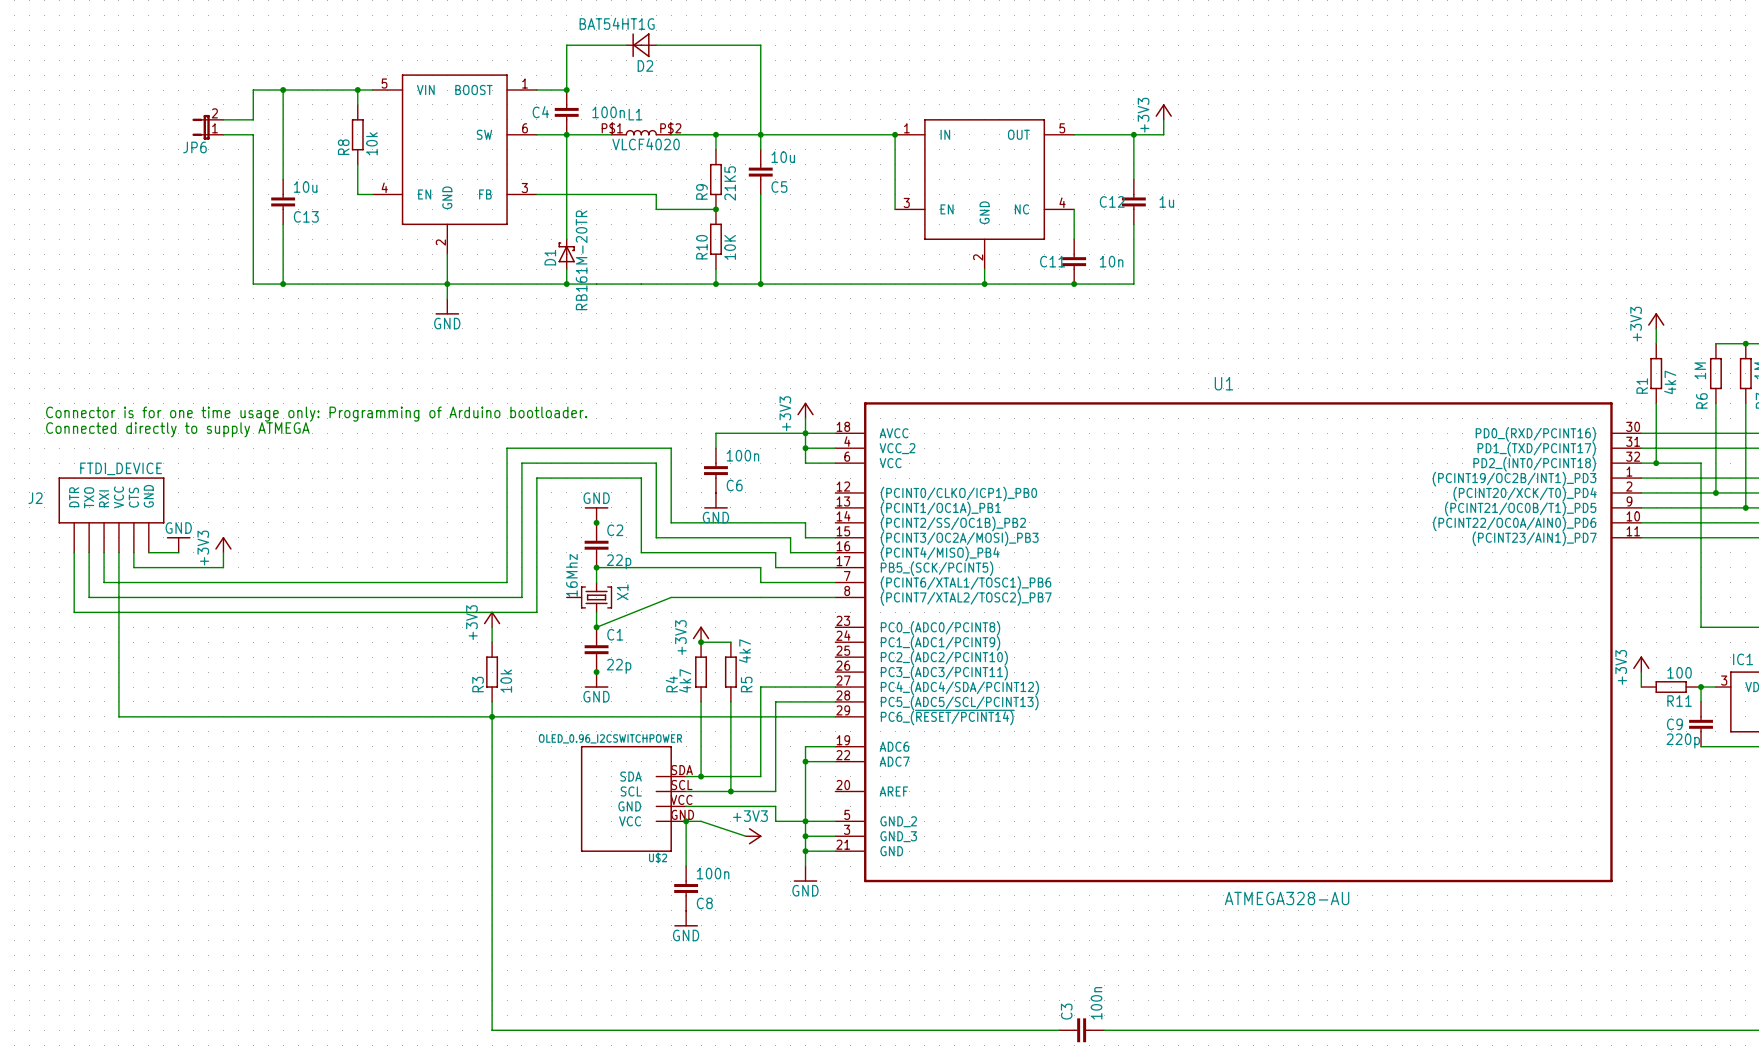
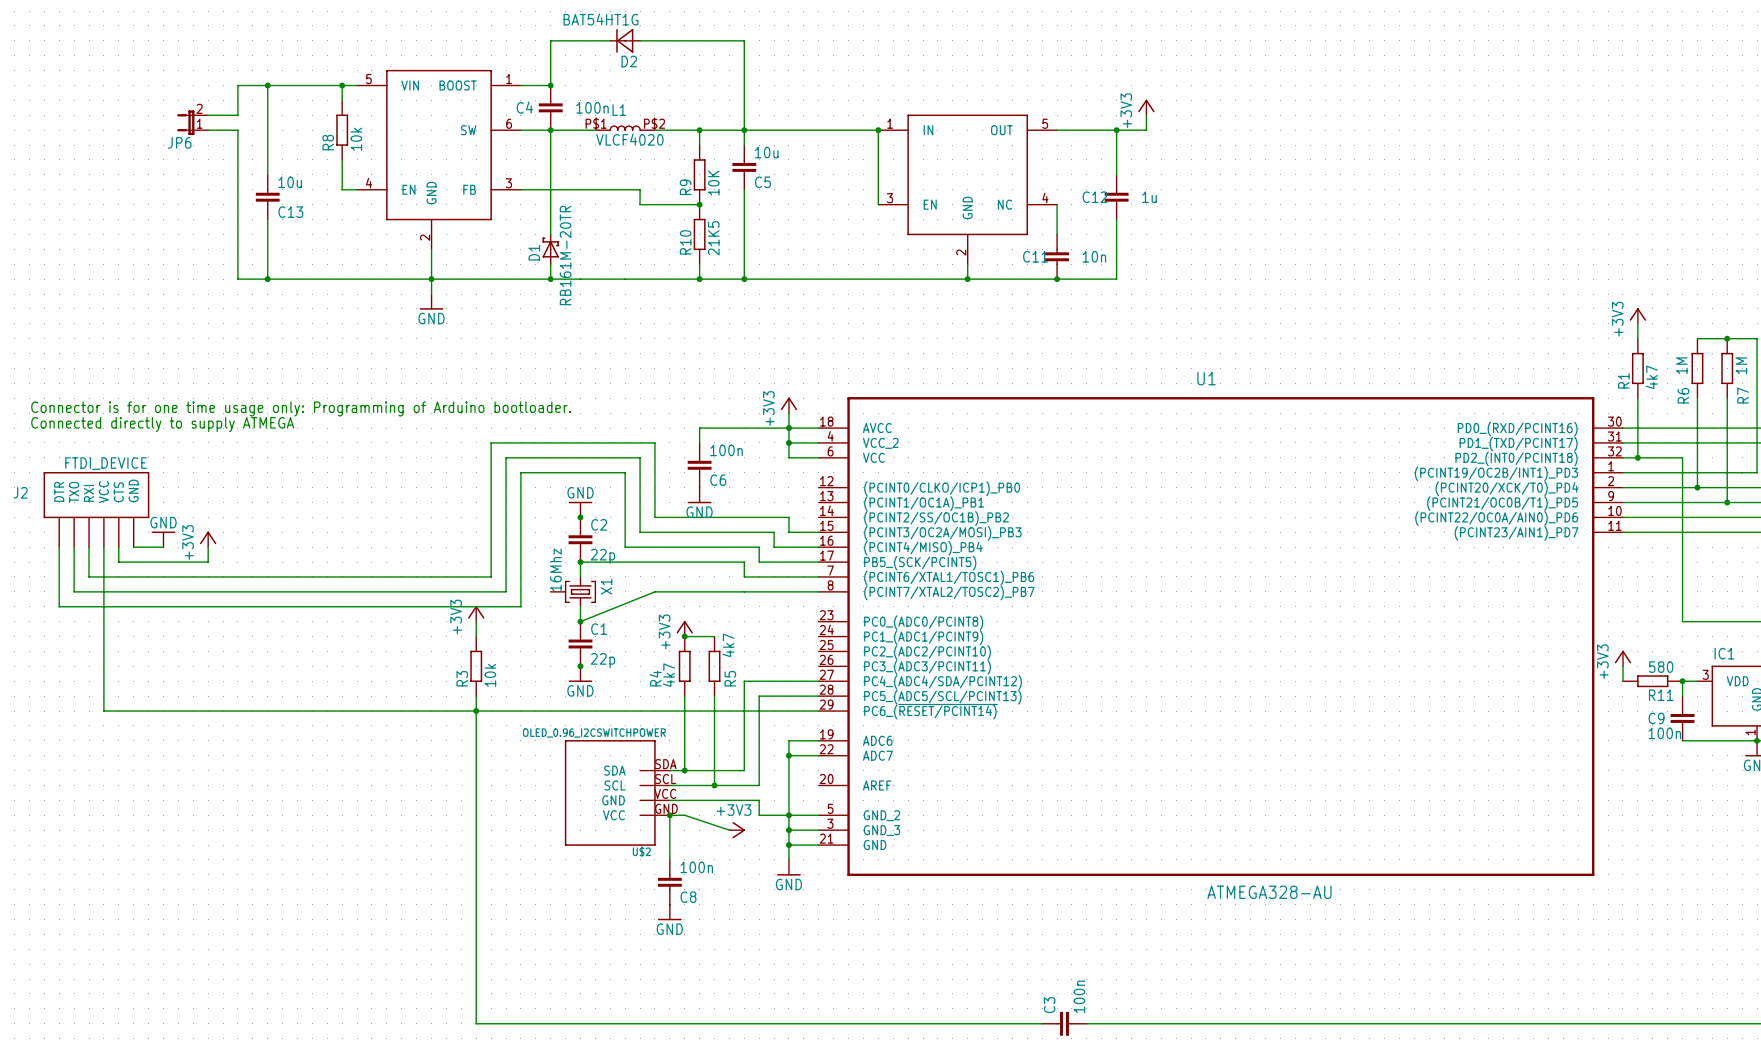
R9 value: 21K5 (730, 183) -> 10K (713, 183)
R10 value: 10K (730, 247) -> 21K5 (713, 238)
R11 value: 100 (1679, 672) -> 580 (1661, 667)
C9 value: 220p (1683, 740) -> 100n (1664, 733)

